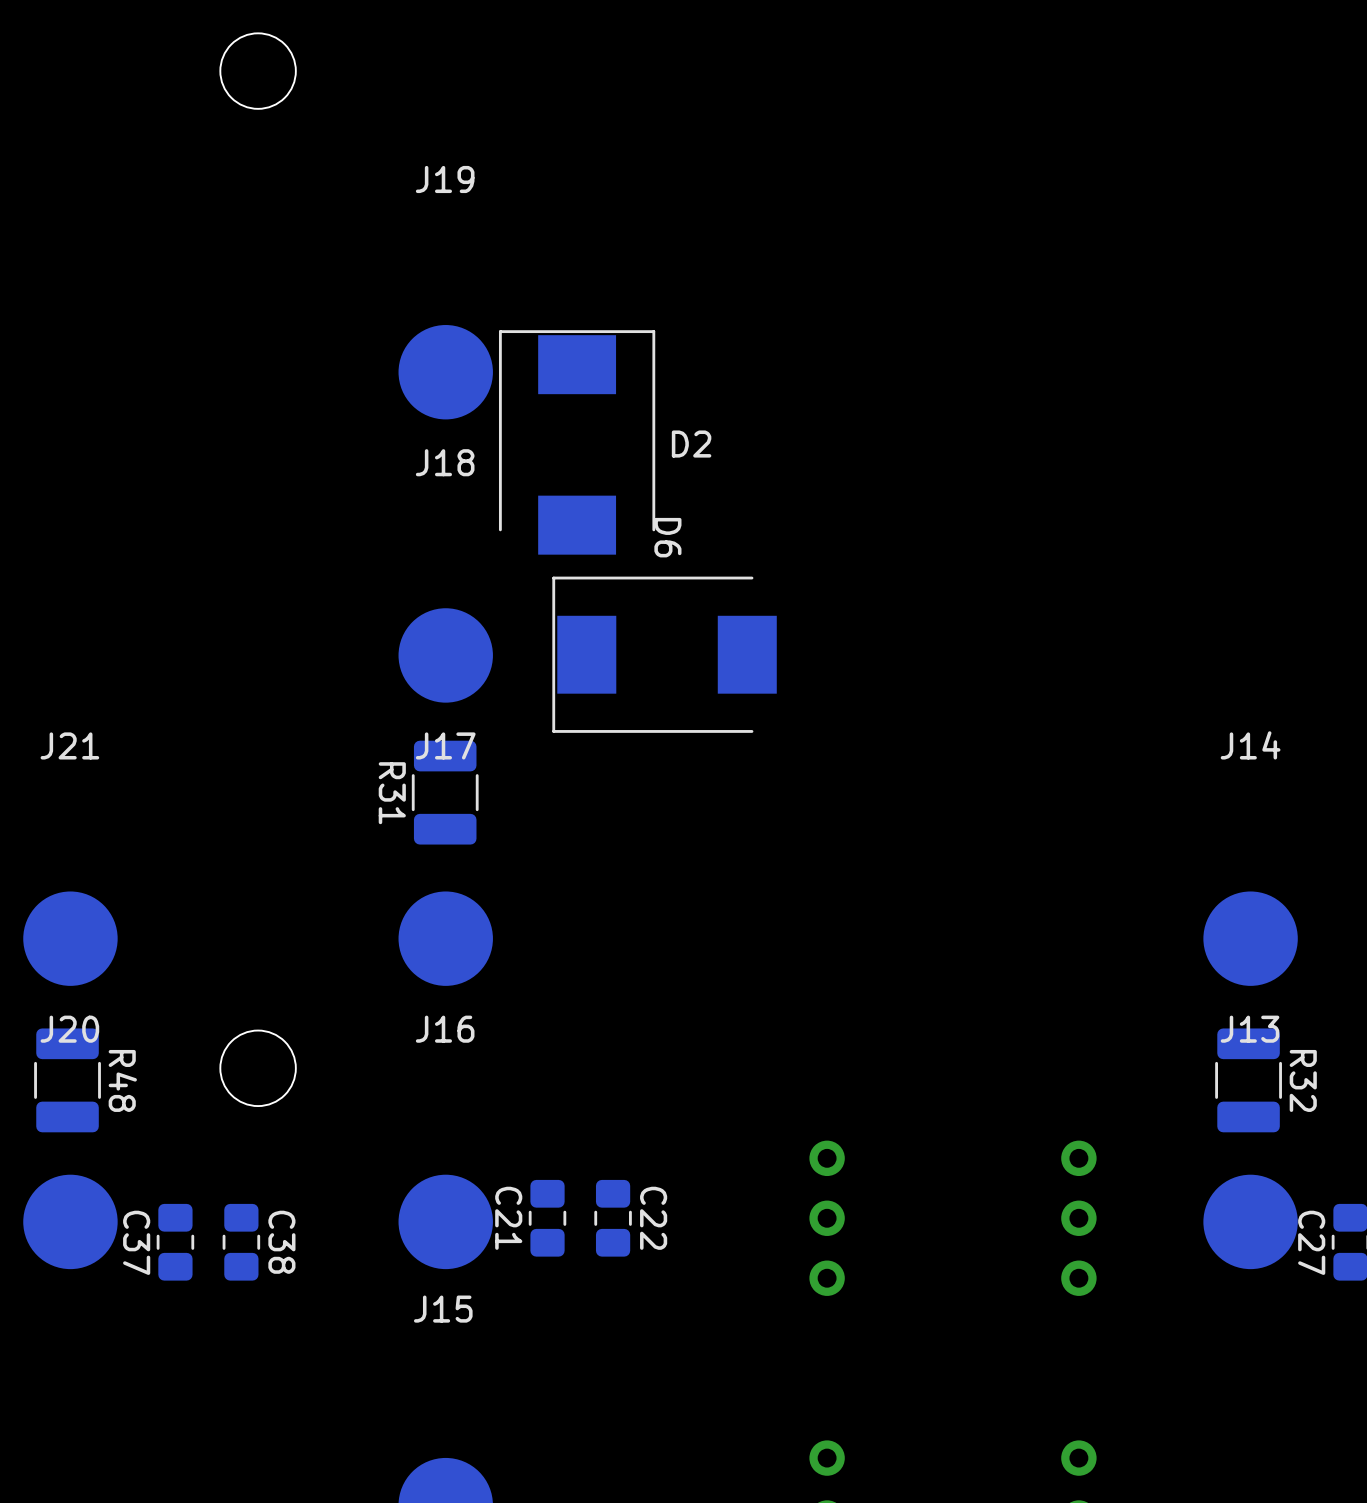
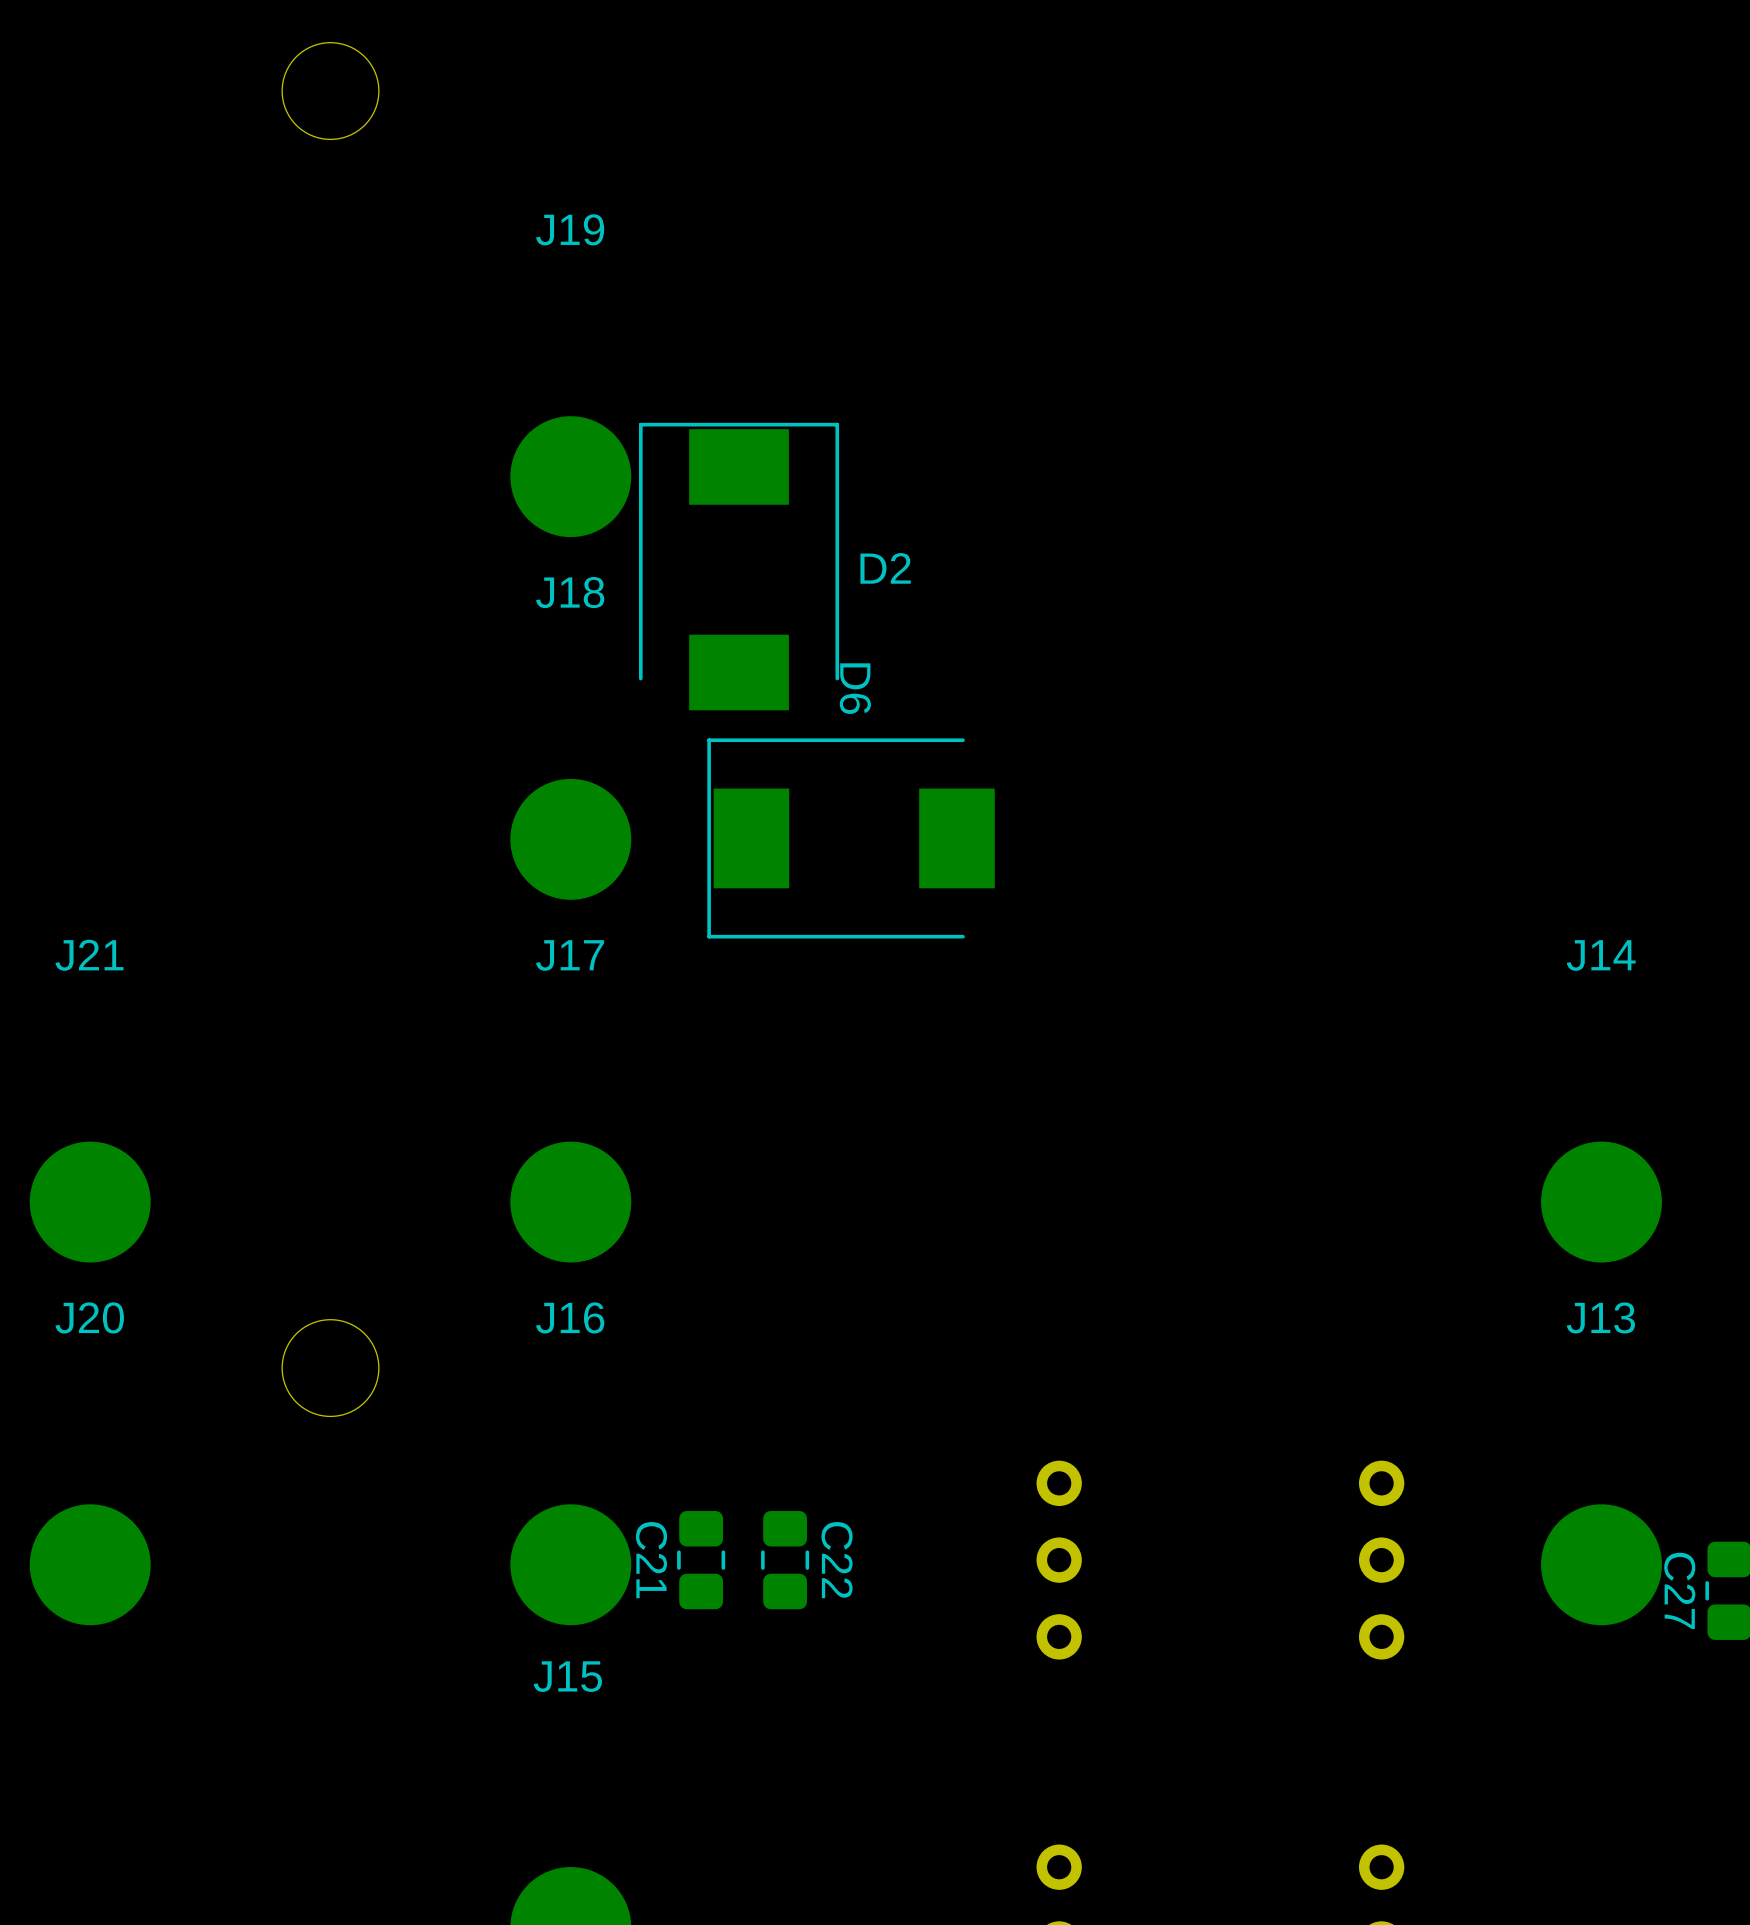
R31: (445, 792) -> none
R48: (67, 1080) -> none
R32: (1248, 1080) -> none
C37: (175, 1242) -> none
C38: (241, 1242) -> none

